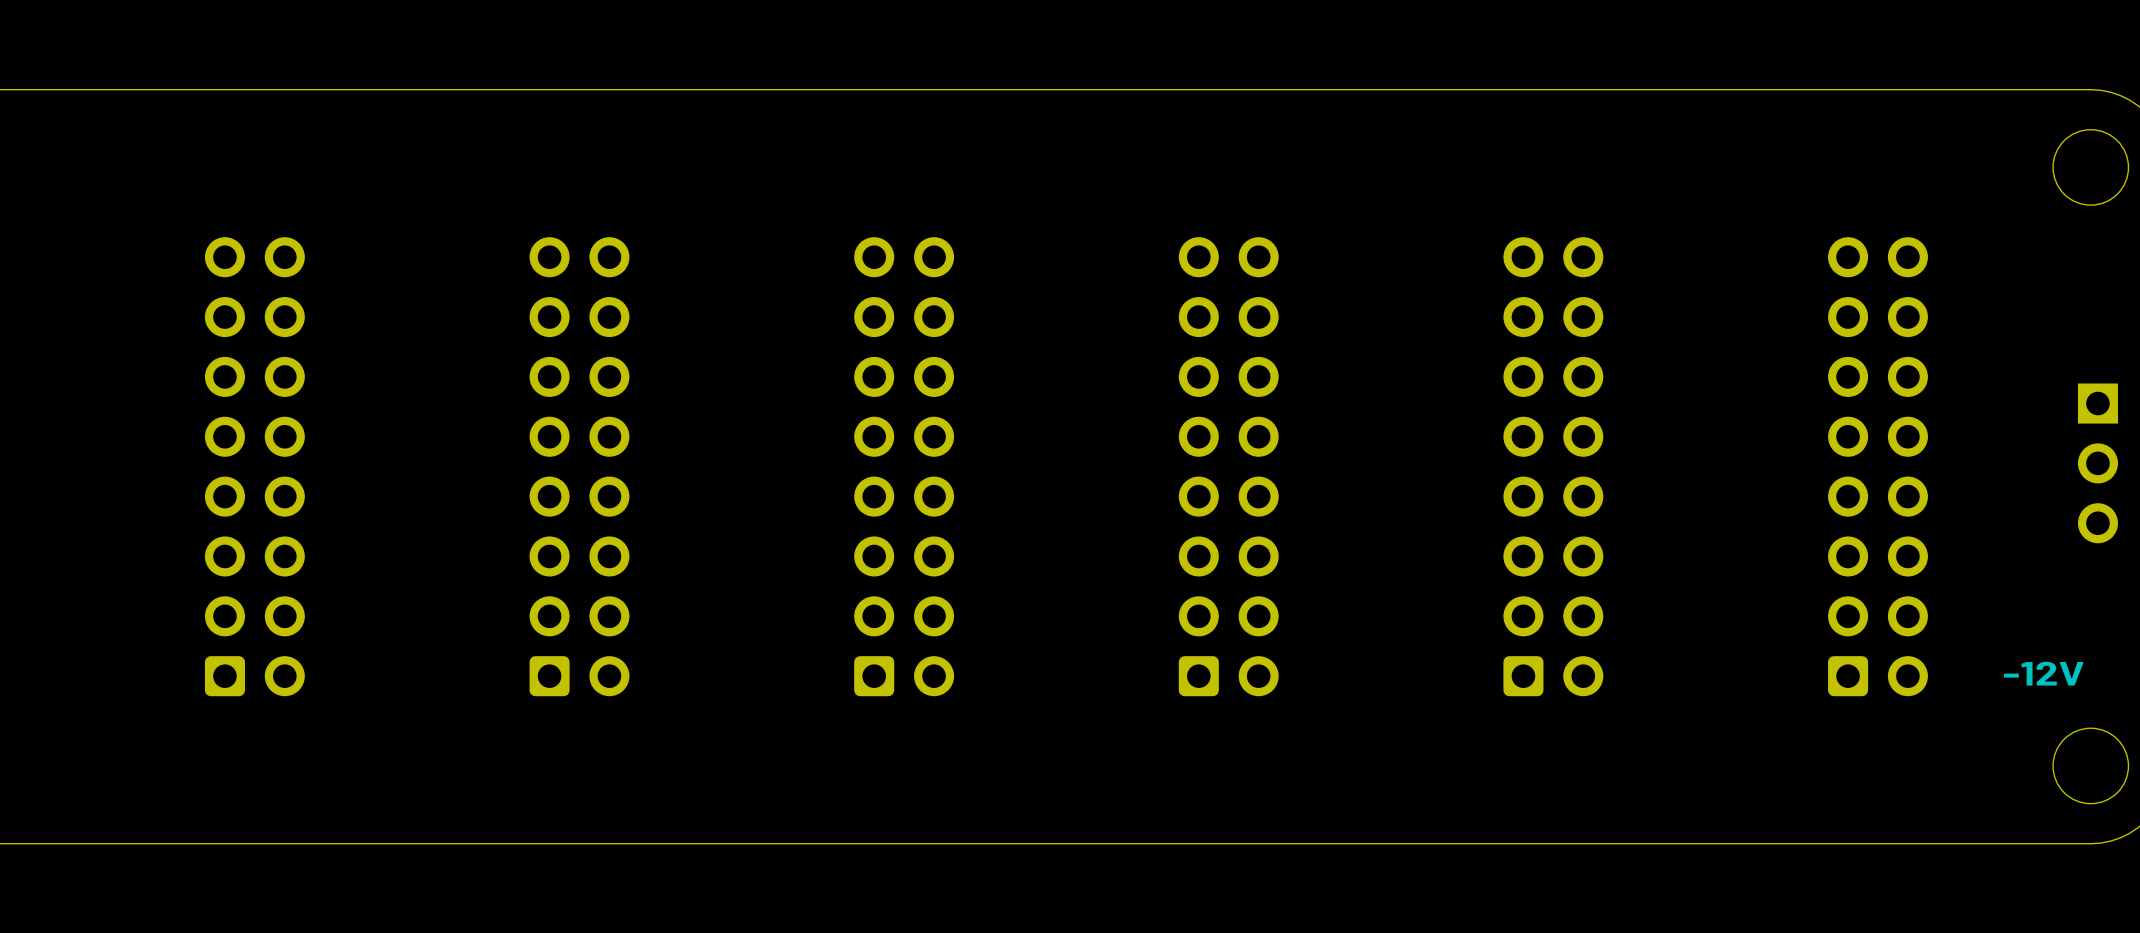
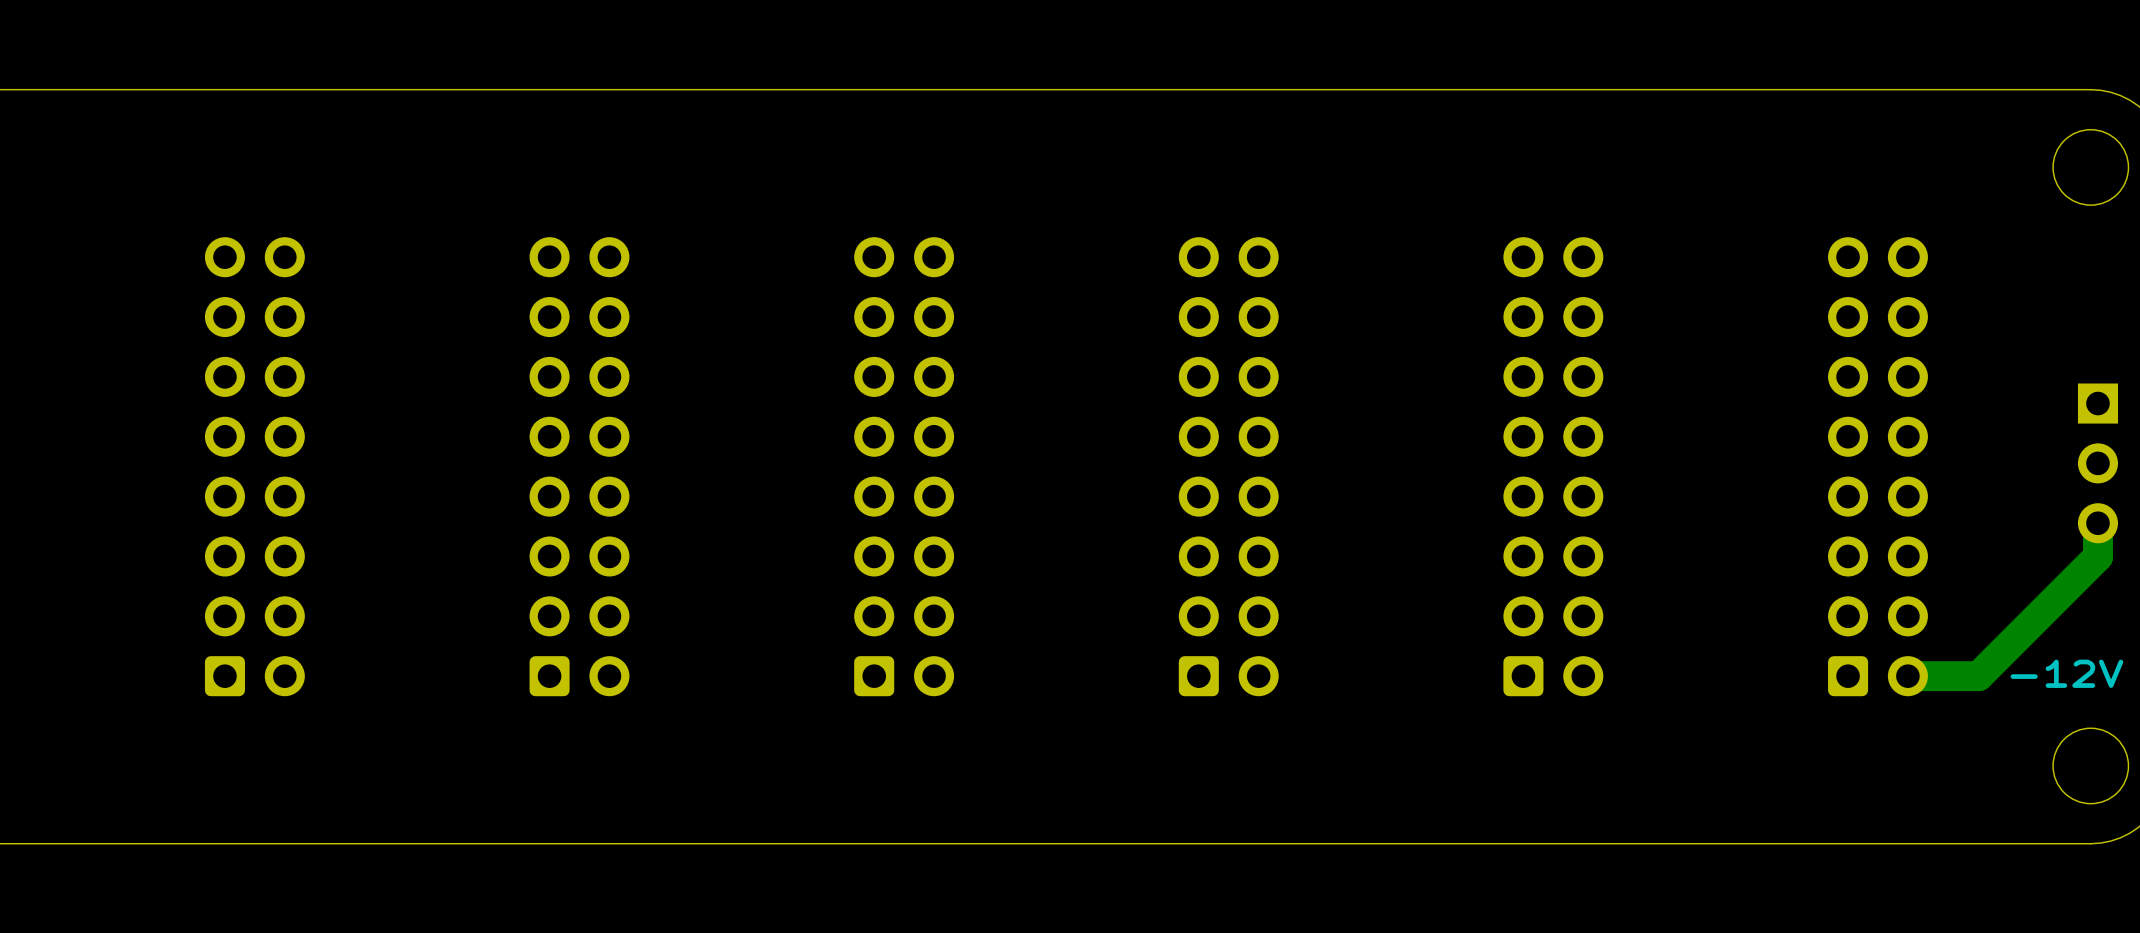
track: none -> (2097, 523) (2097, 556) (1978, 676) (1907, 676)

